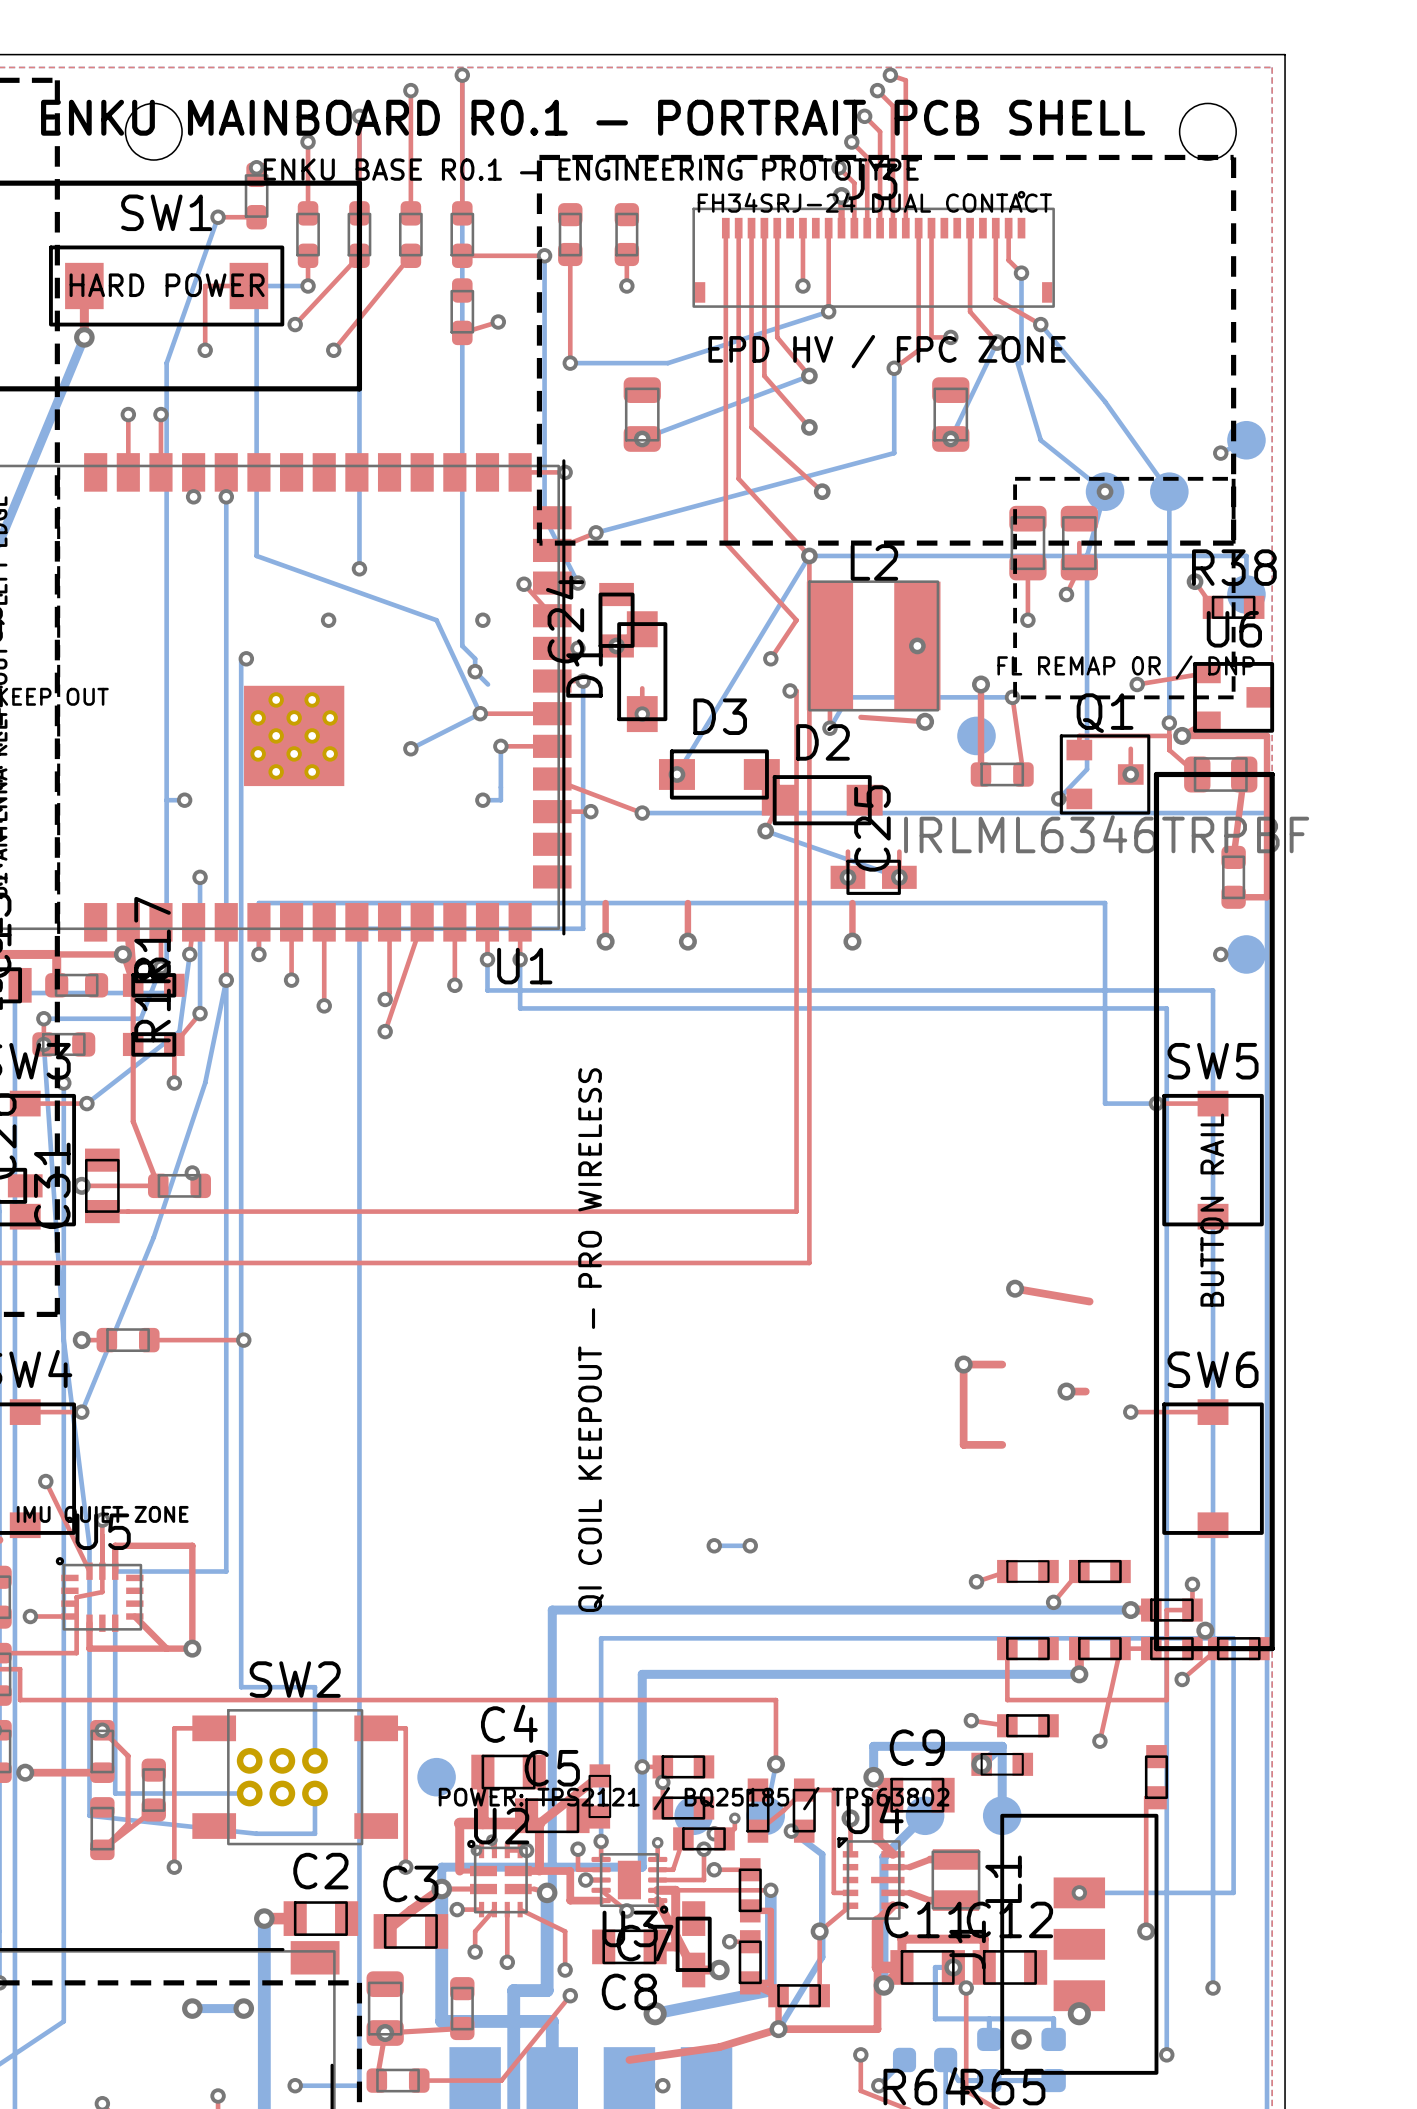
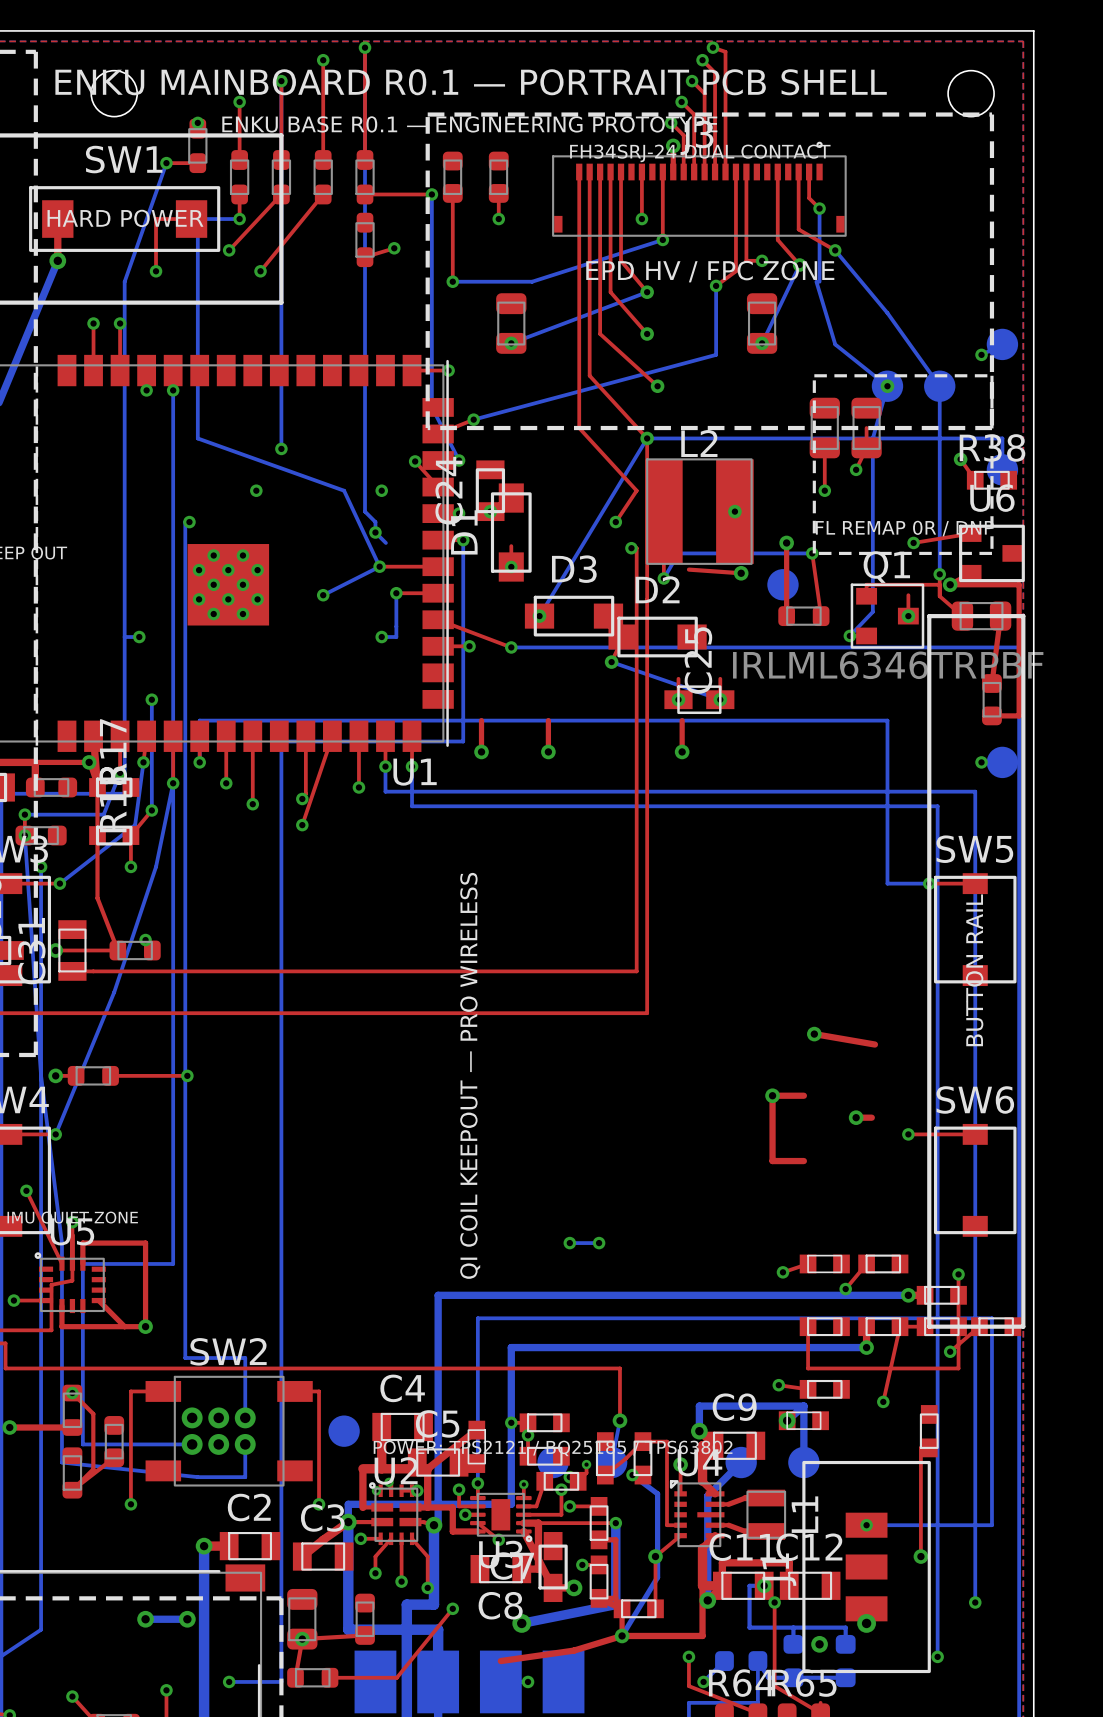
top track: (1192, 1610) (1166, 1610) (1166, 1700) -> (958, 1295) (958, 1368) (937, 1368)
via: (1205, 1630) -> none
top track: (520, 1909) (565, 1931) (565, 1970) -> (412, 1538) (427, 1556) (427, 1587)
via position: (565, 1970) -> (427, 1587)

